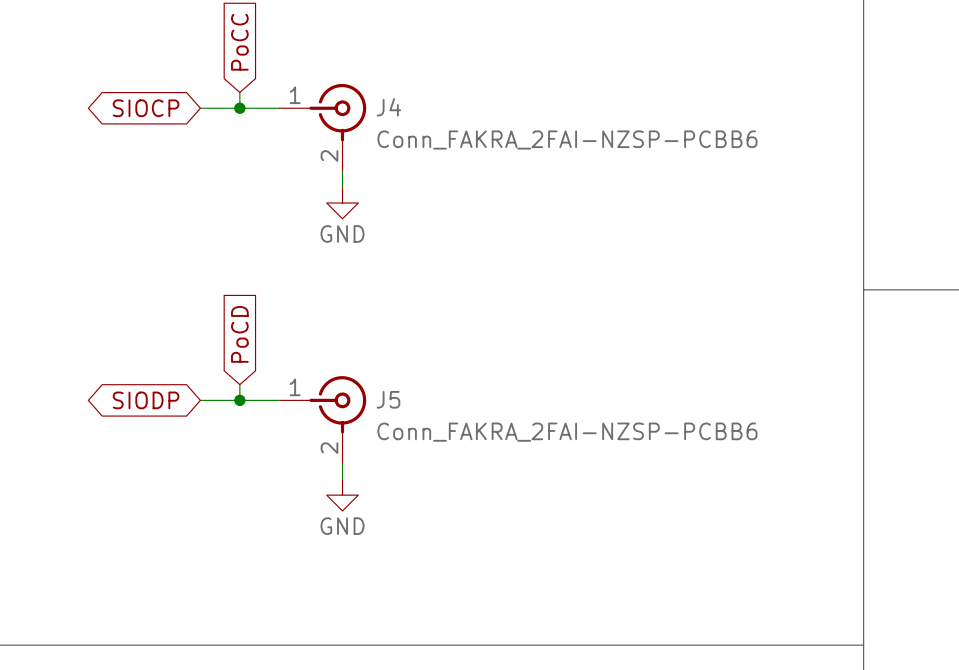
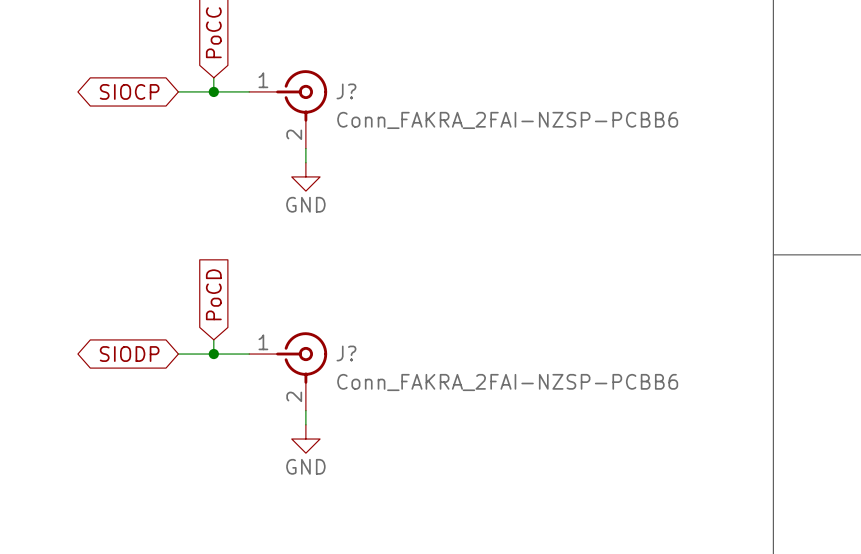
J4 name: J4 (388, 107) -> J? (346, 91)
J5 name: J5 (388, 399) -> J? (346, 353)

